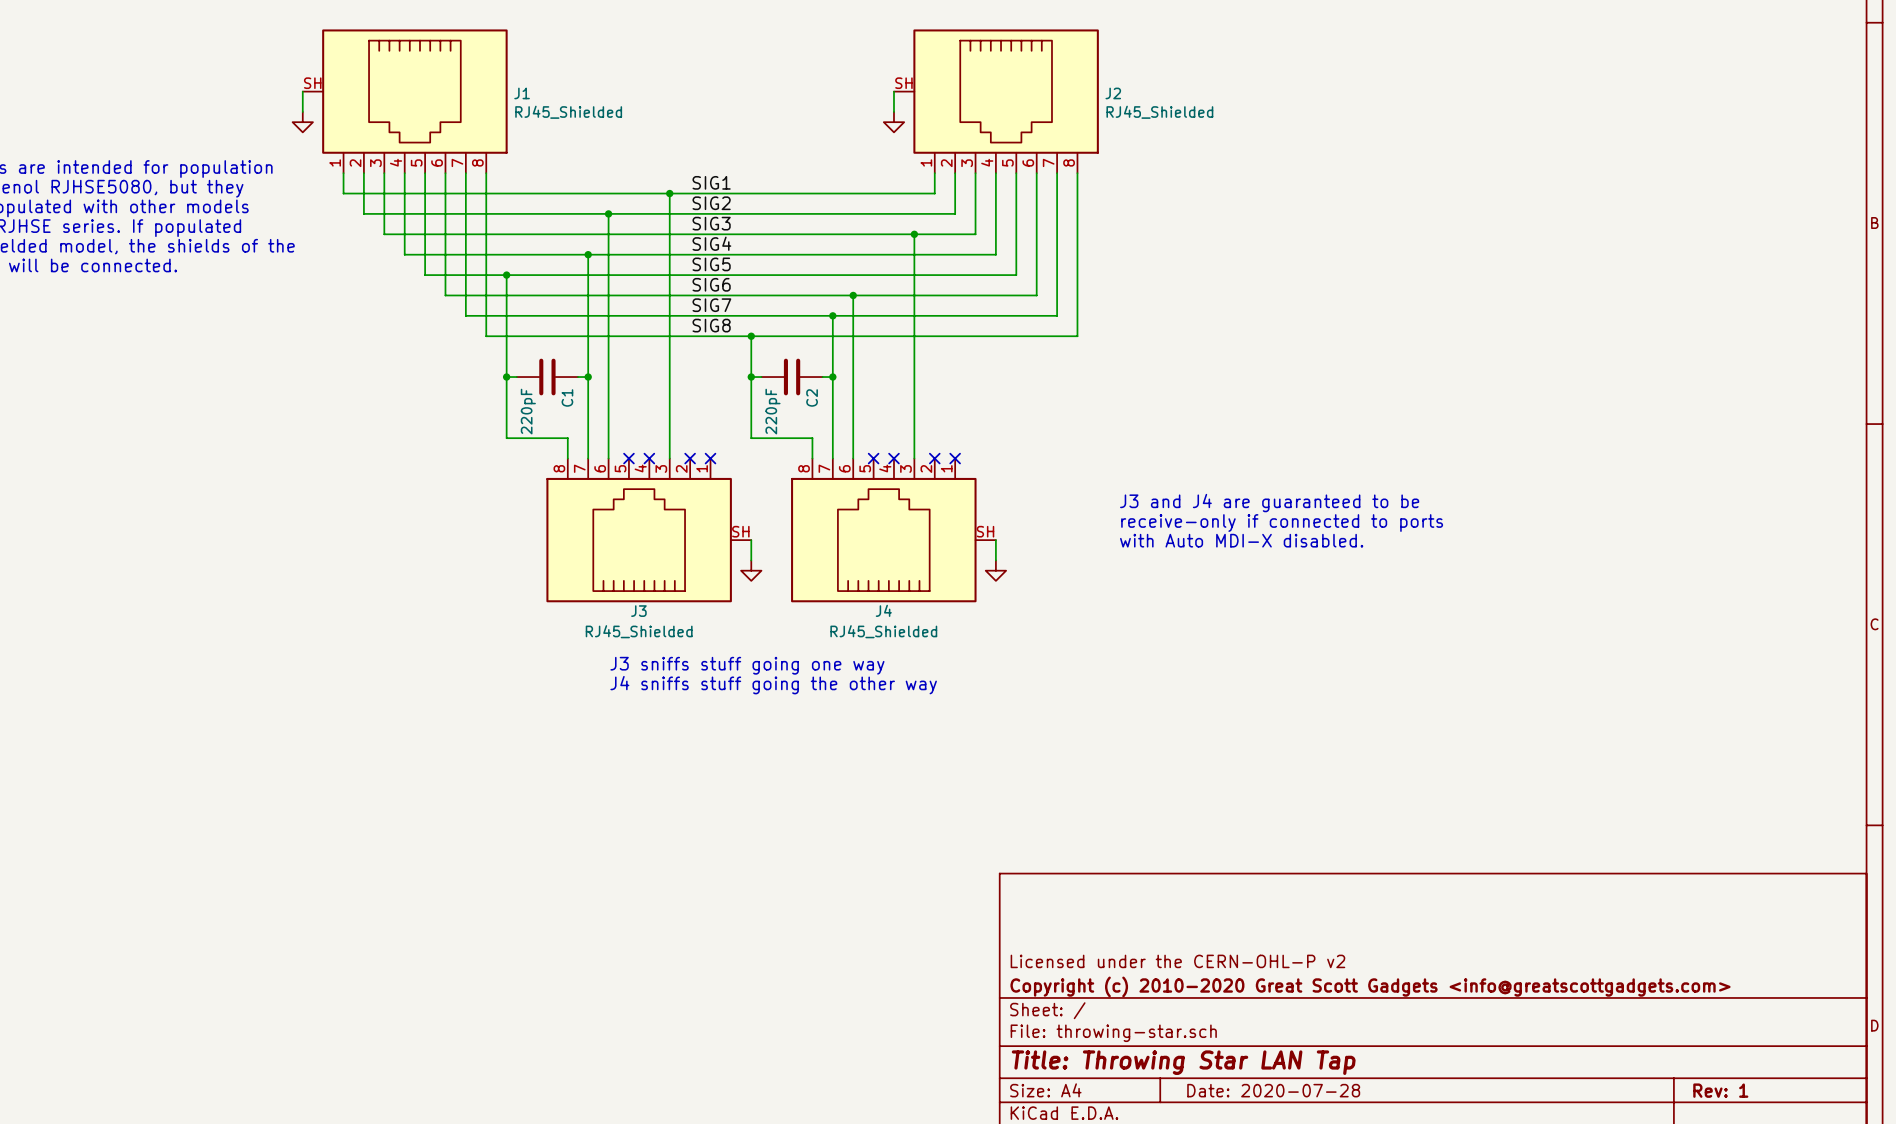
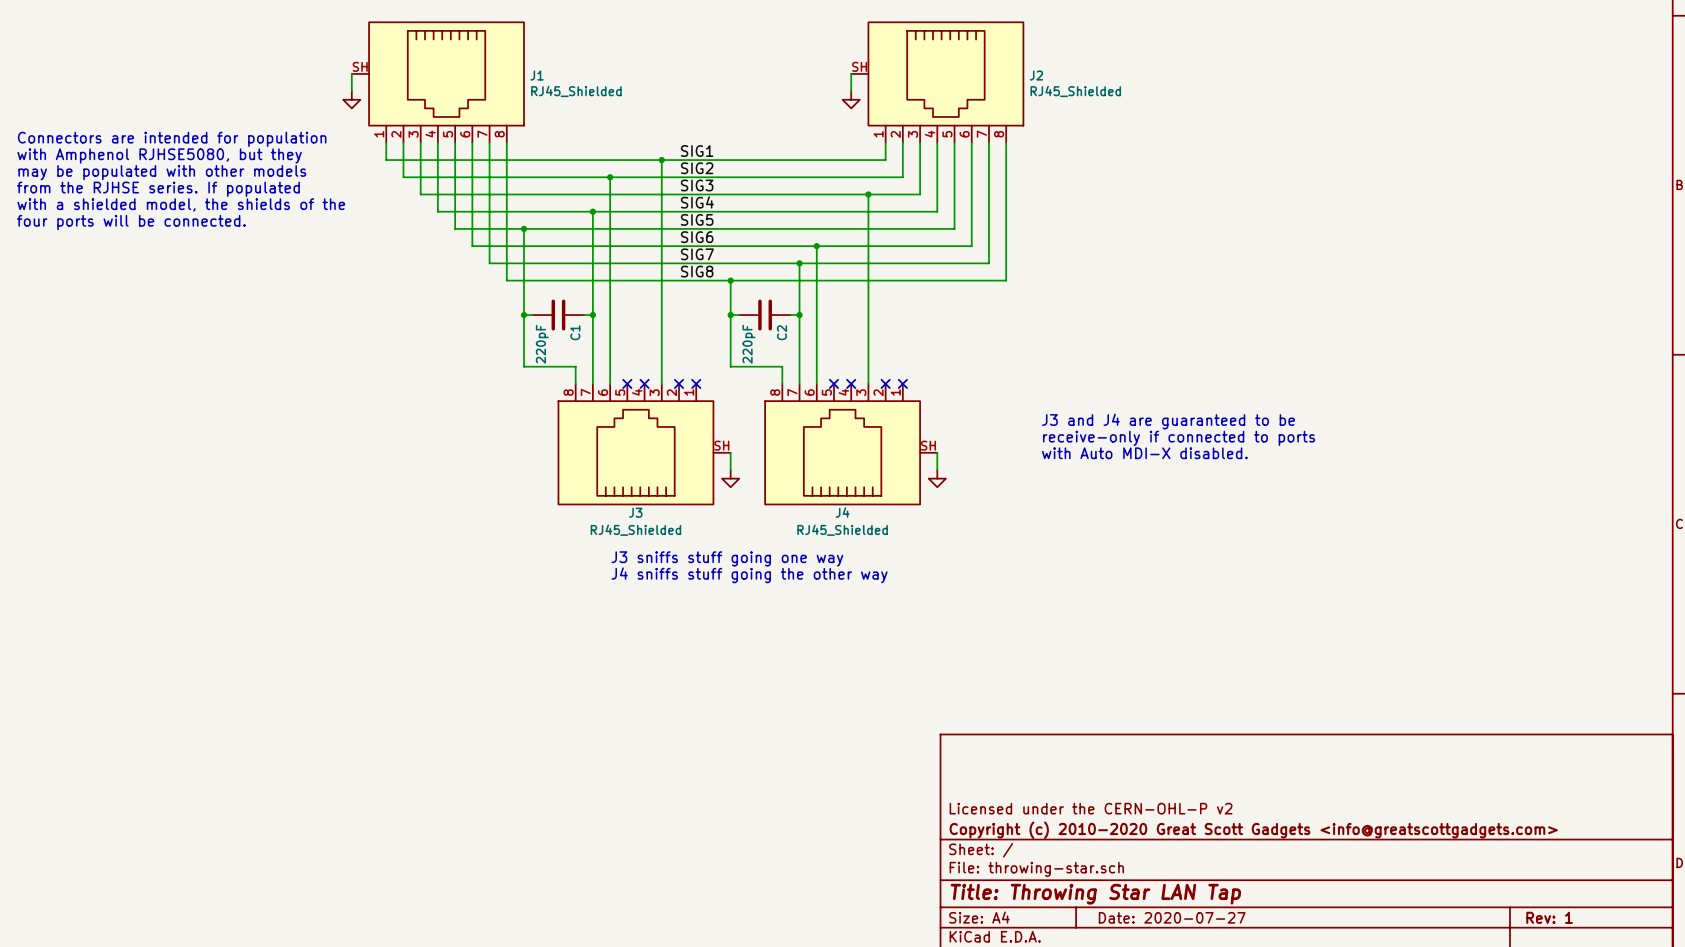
title block: Date: 2020-07-28 (1273, 1090) -> Date: 2020-07-27 (1172, 917)

